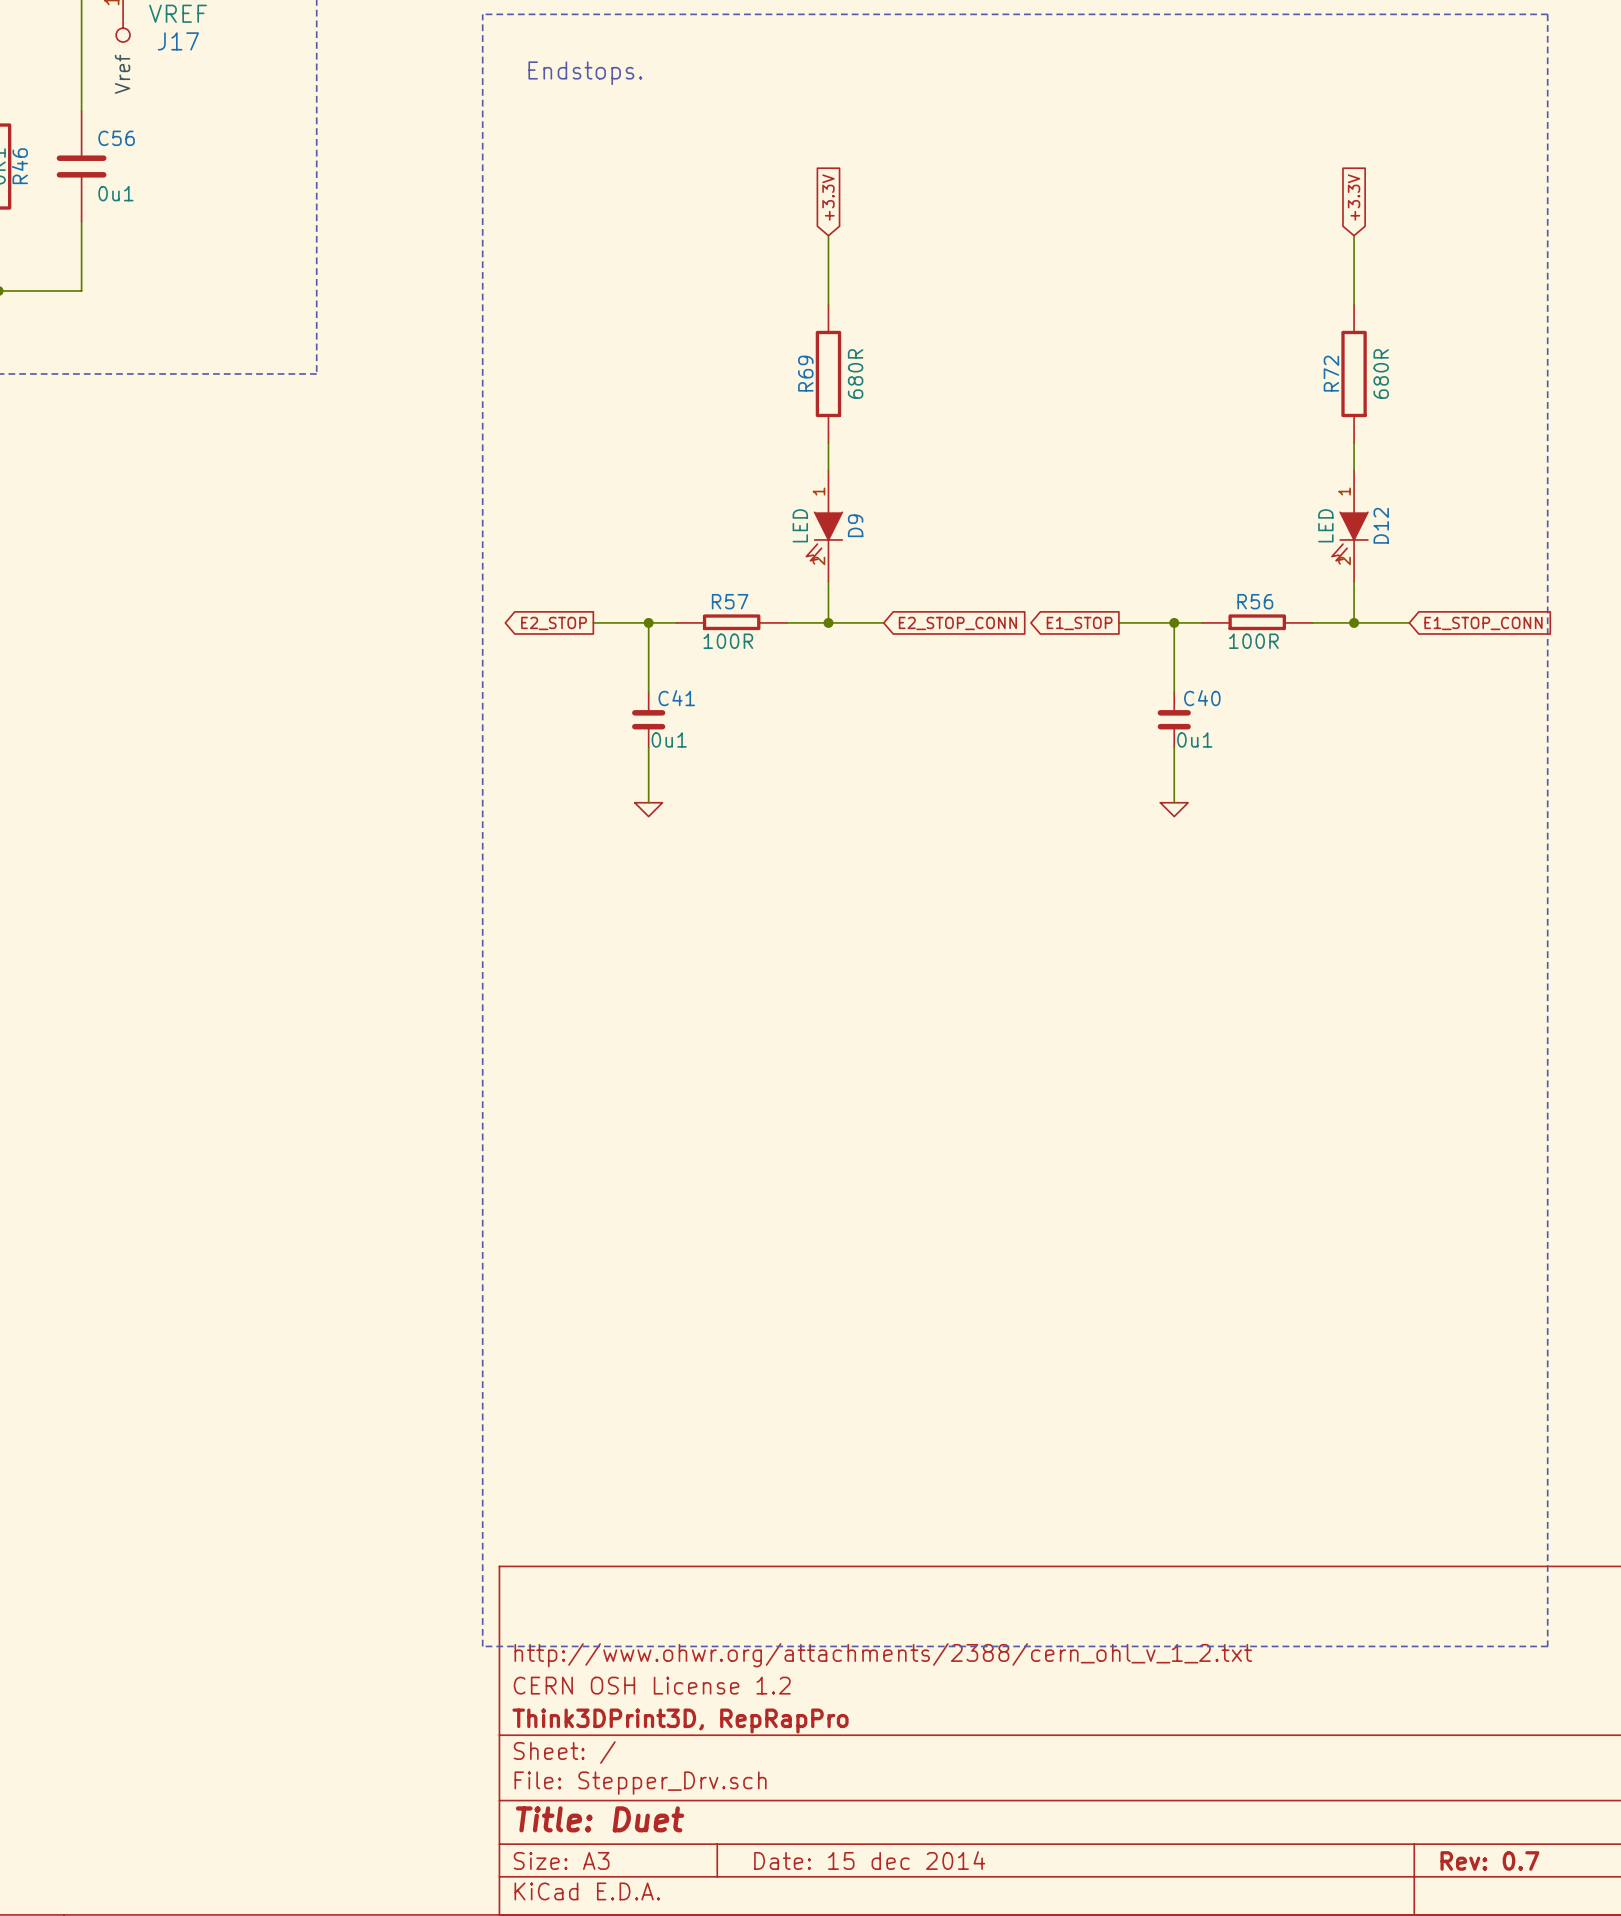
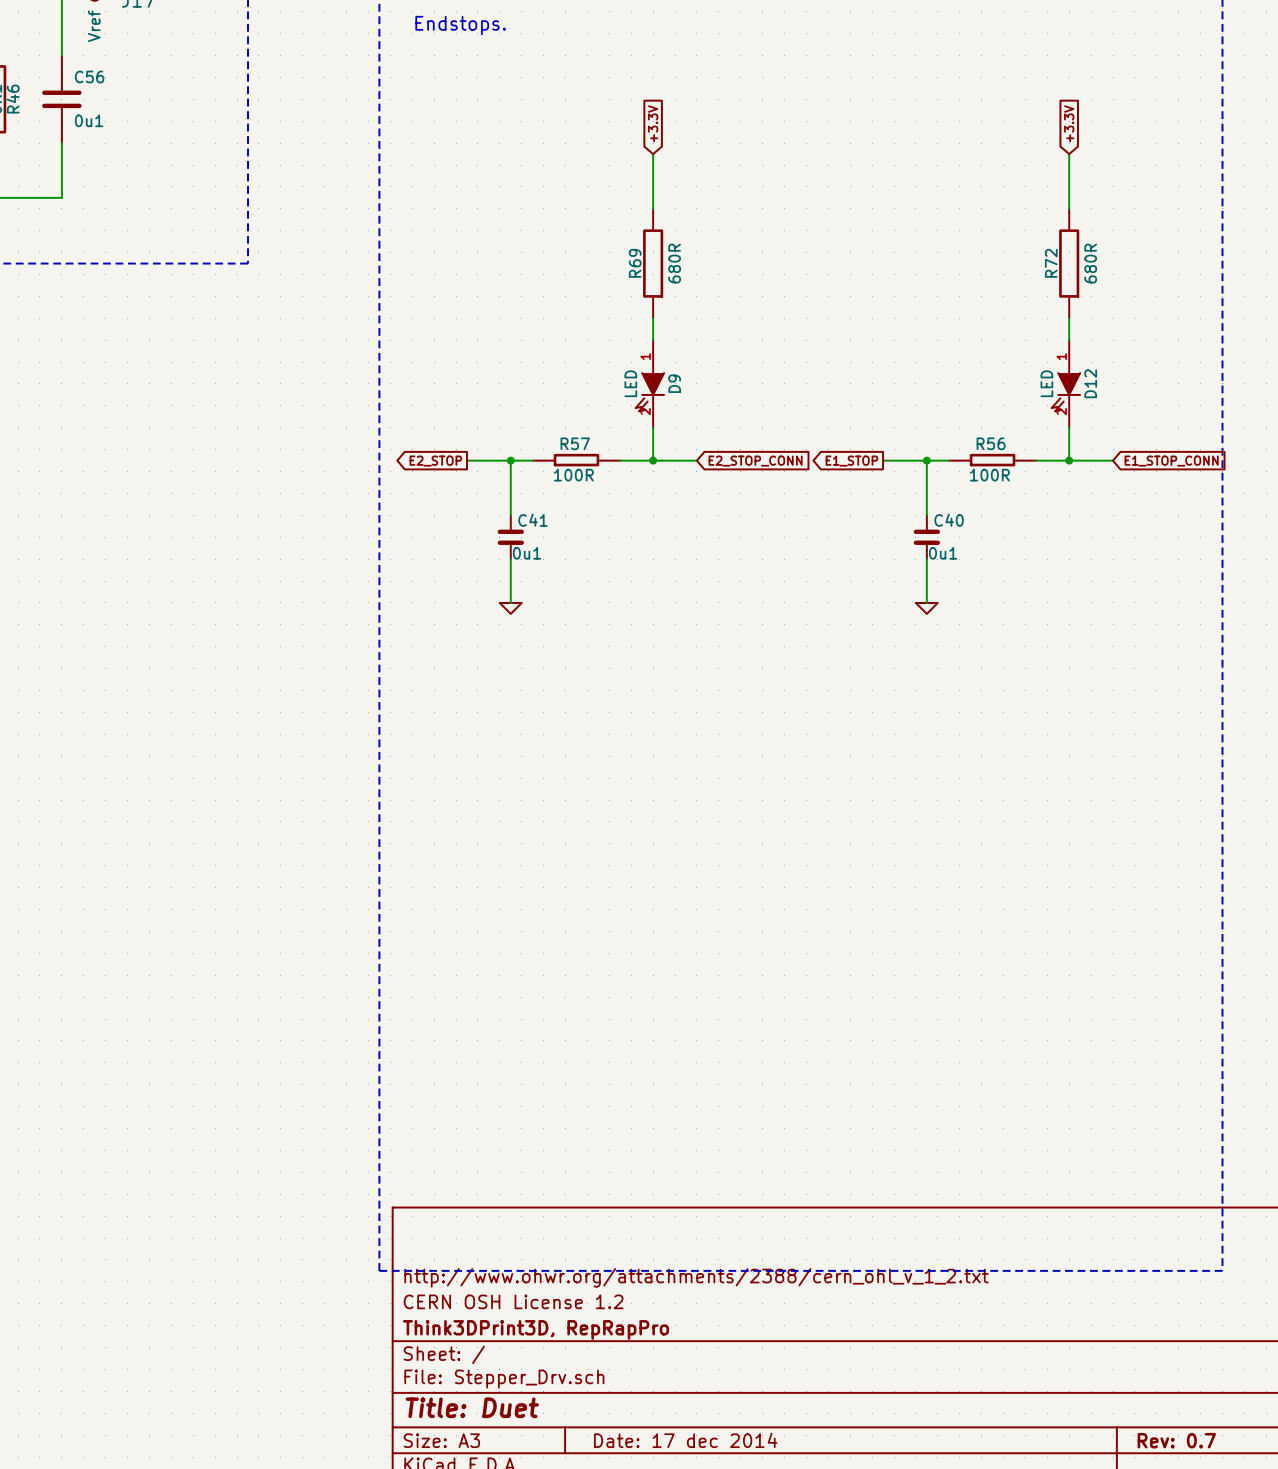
title block: Date: 15 dec 2014 (869, 1860) -> Date: 17 dec 2014 (685, 1440)

